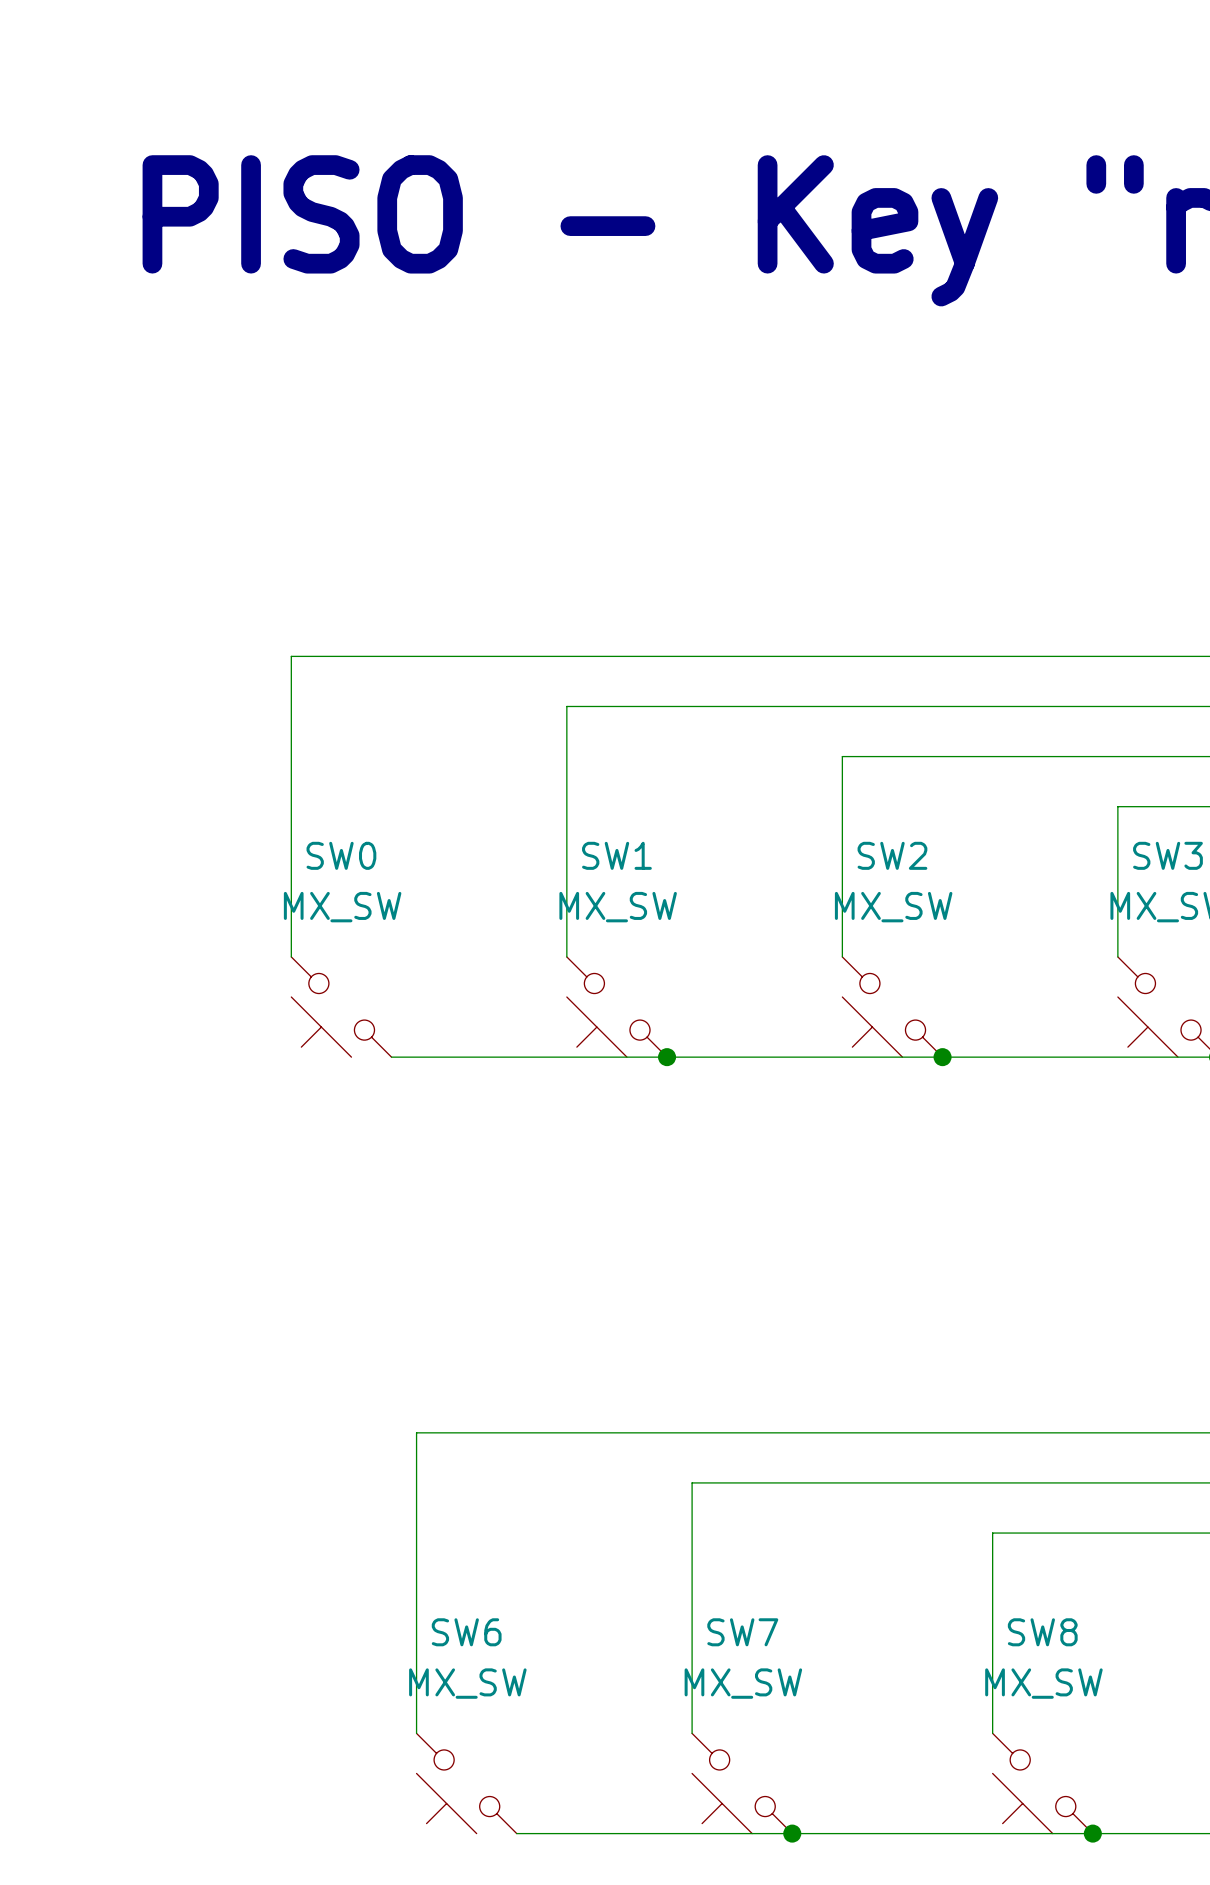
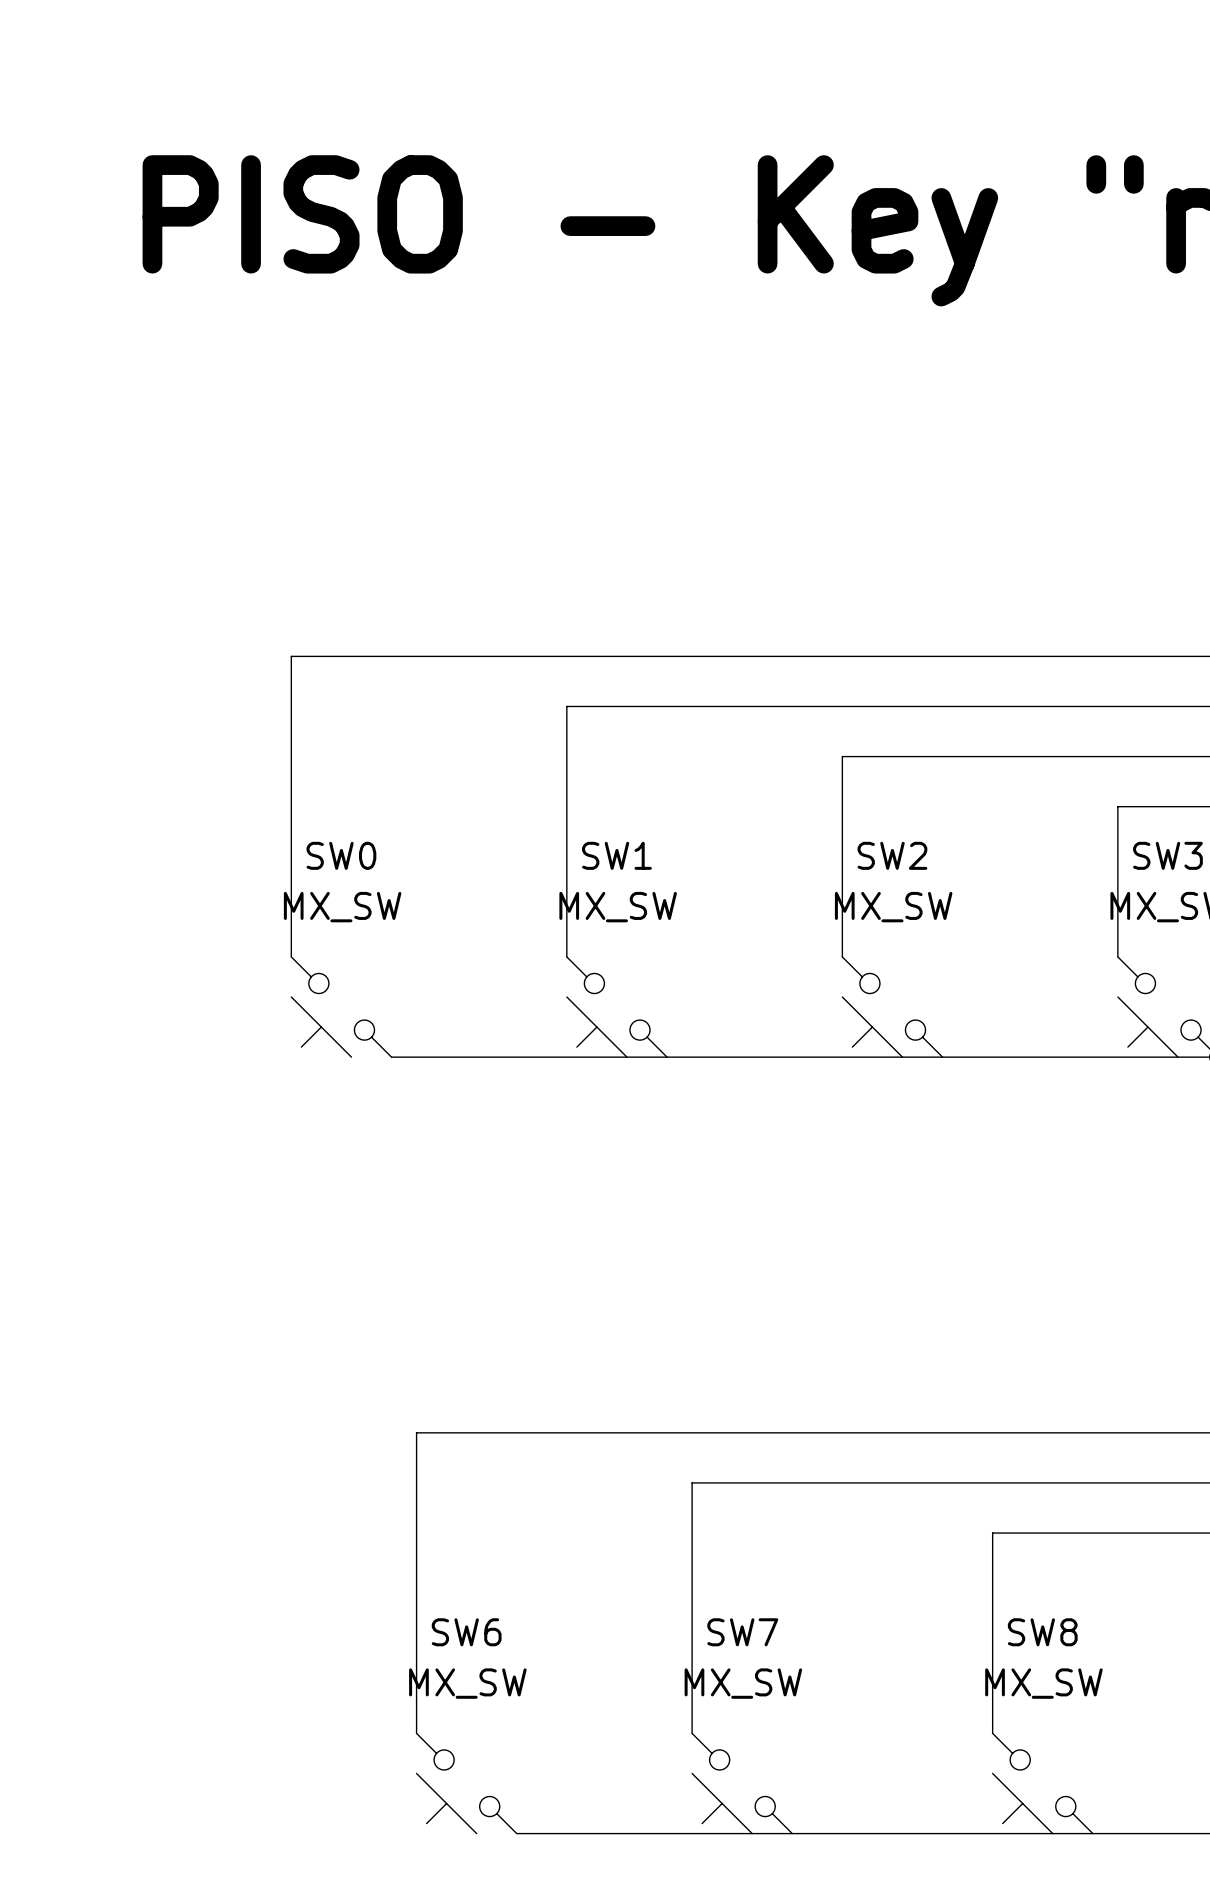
junction: (667, 1057) -> none
junction: (942, 1057) -> none
junction: (792, 1833) -> none
junction: (1092, 1833) -> none

